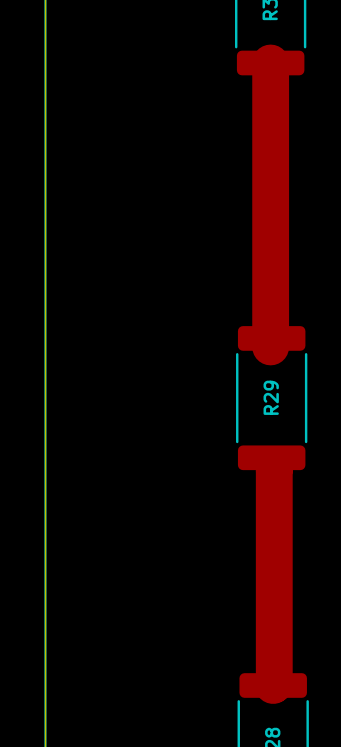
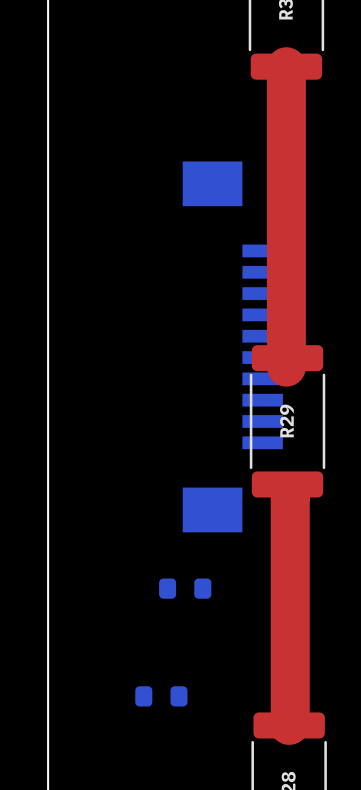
part: none -> (232, 346)
part: none -> (185, 588)
part: none -> (161, 696)

